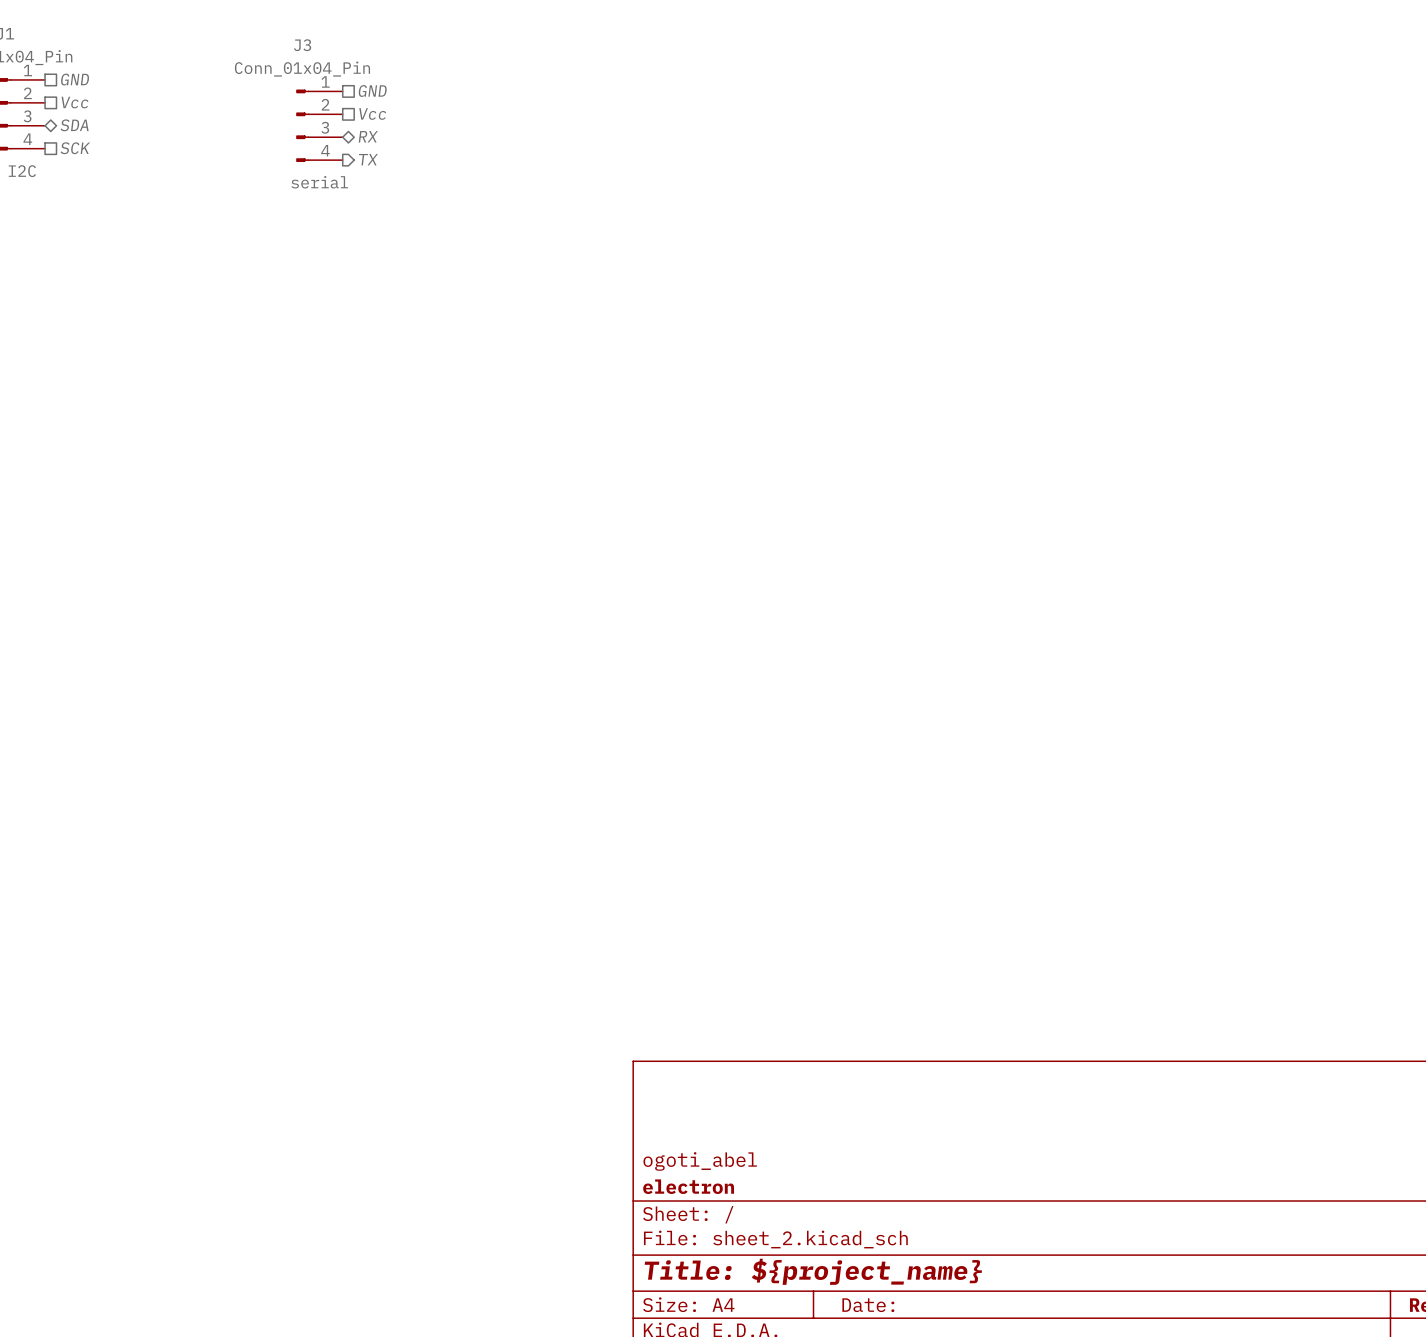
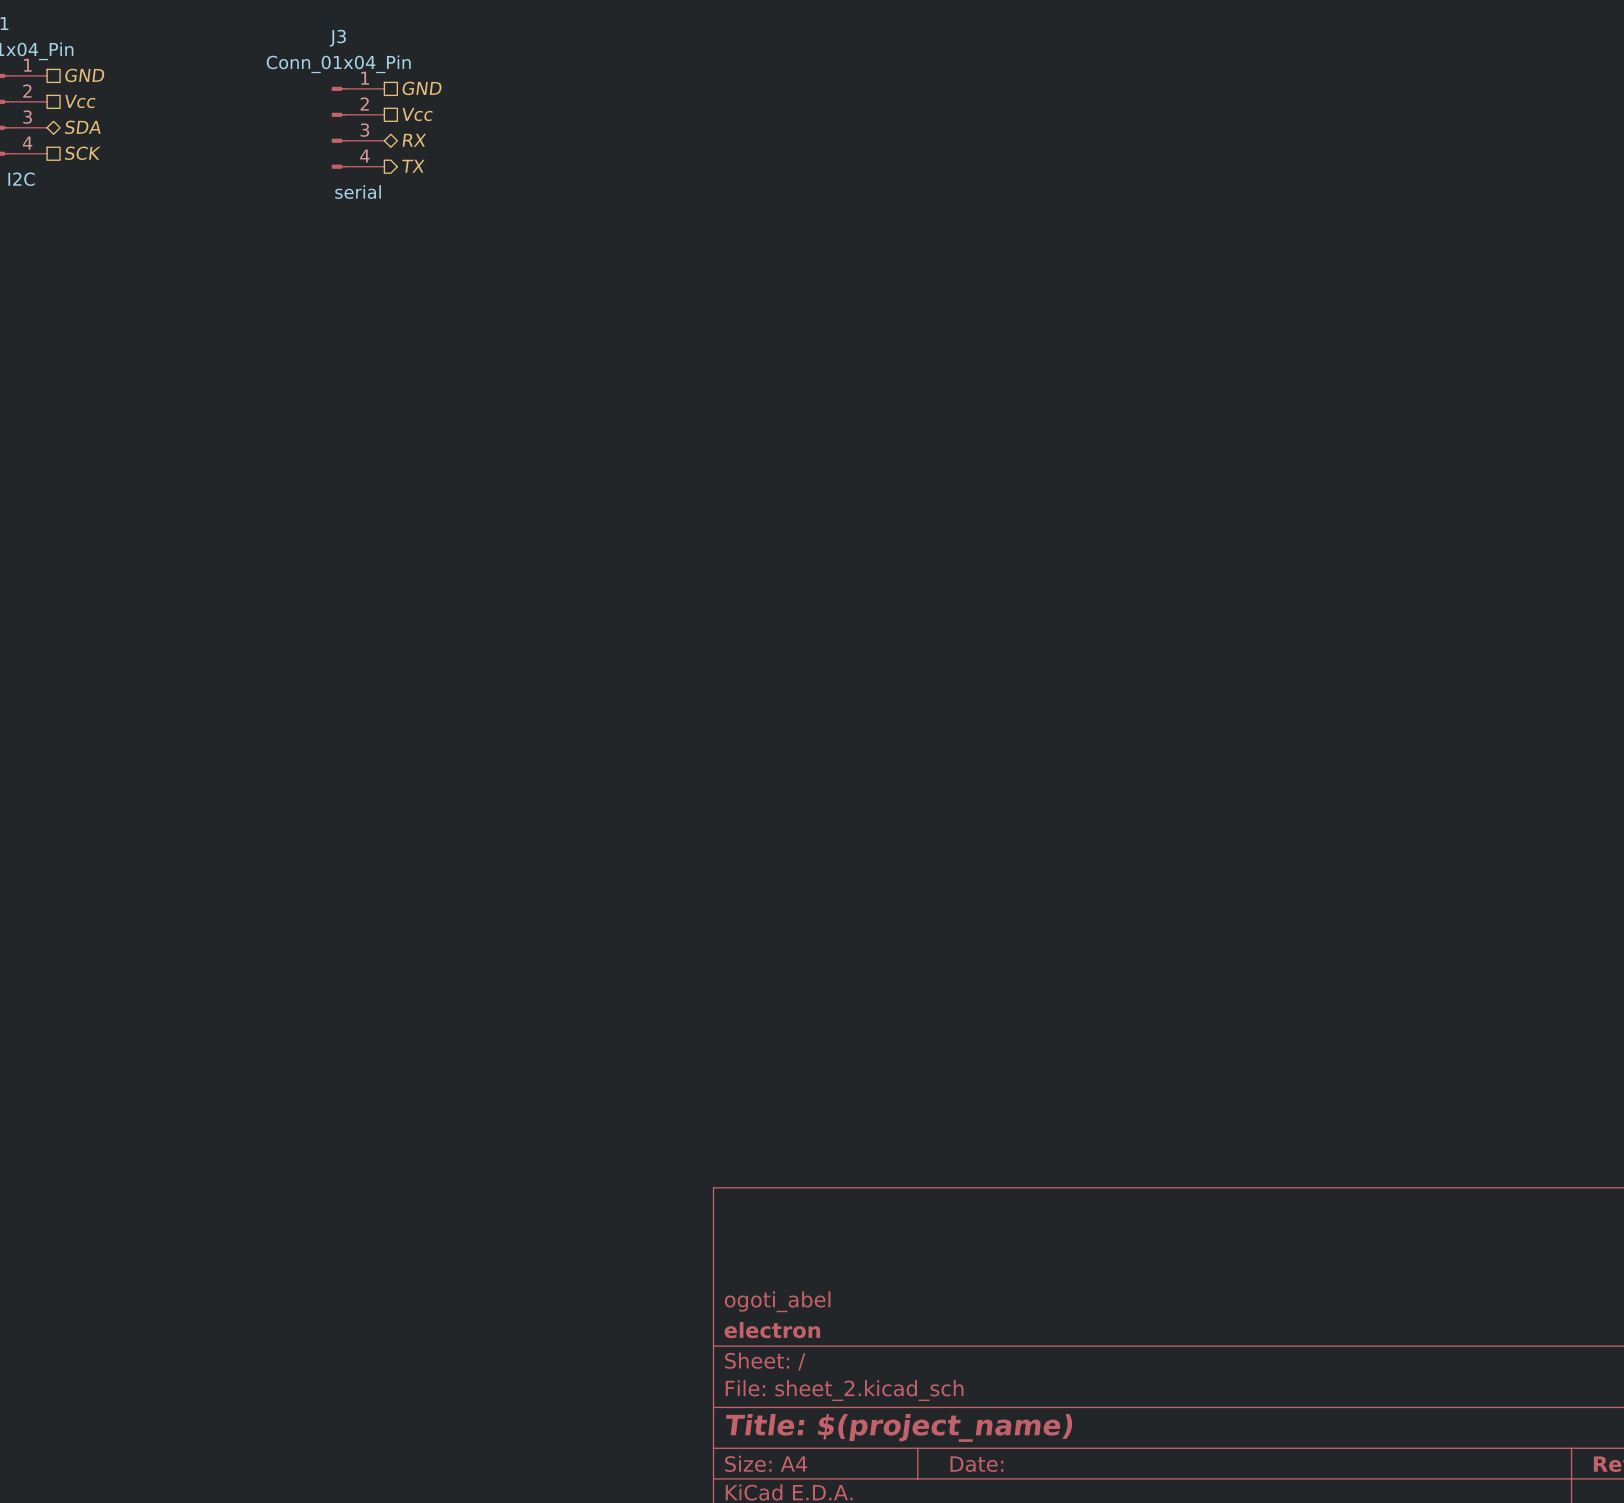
title block: Title: ${project_name} (813, 1271) -> Title: $(project_name) (899, 1427)

